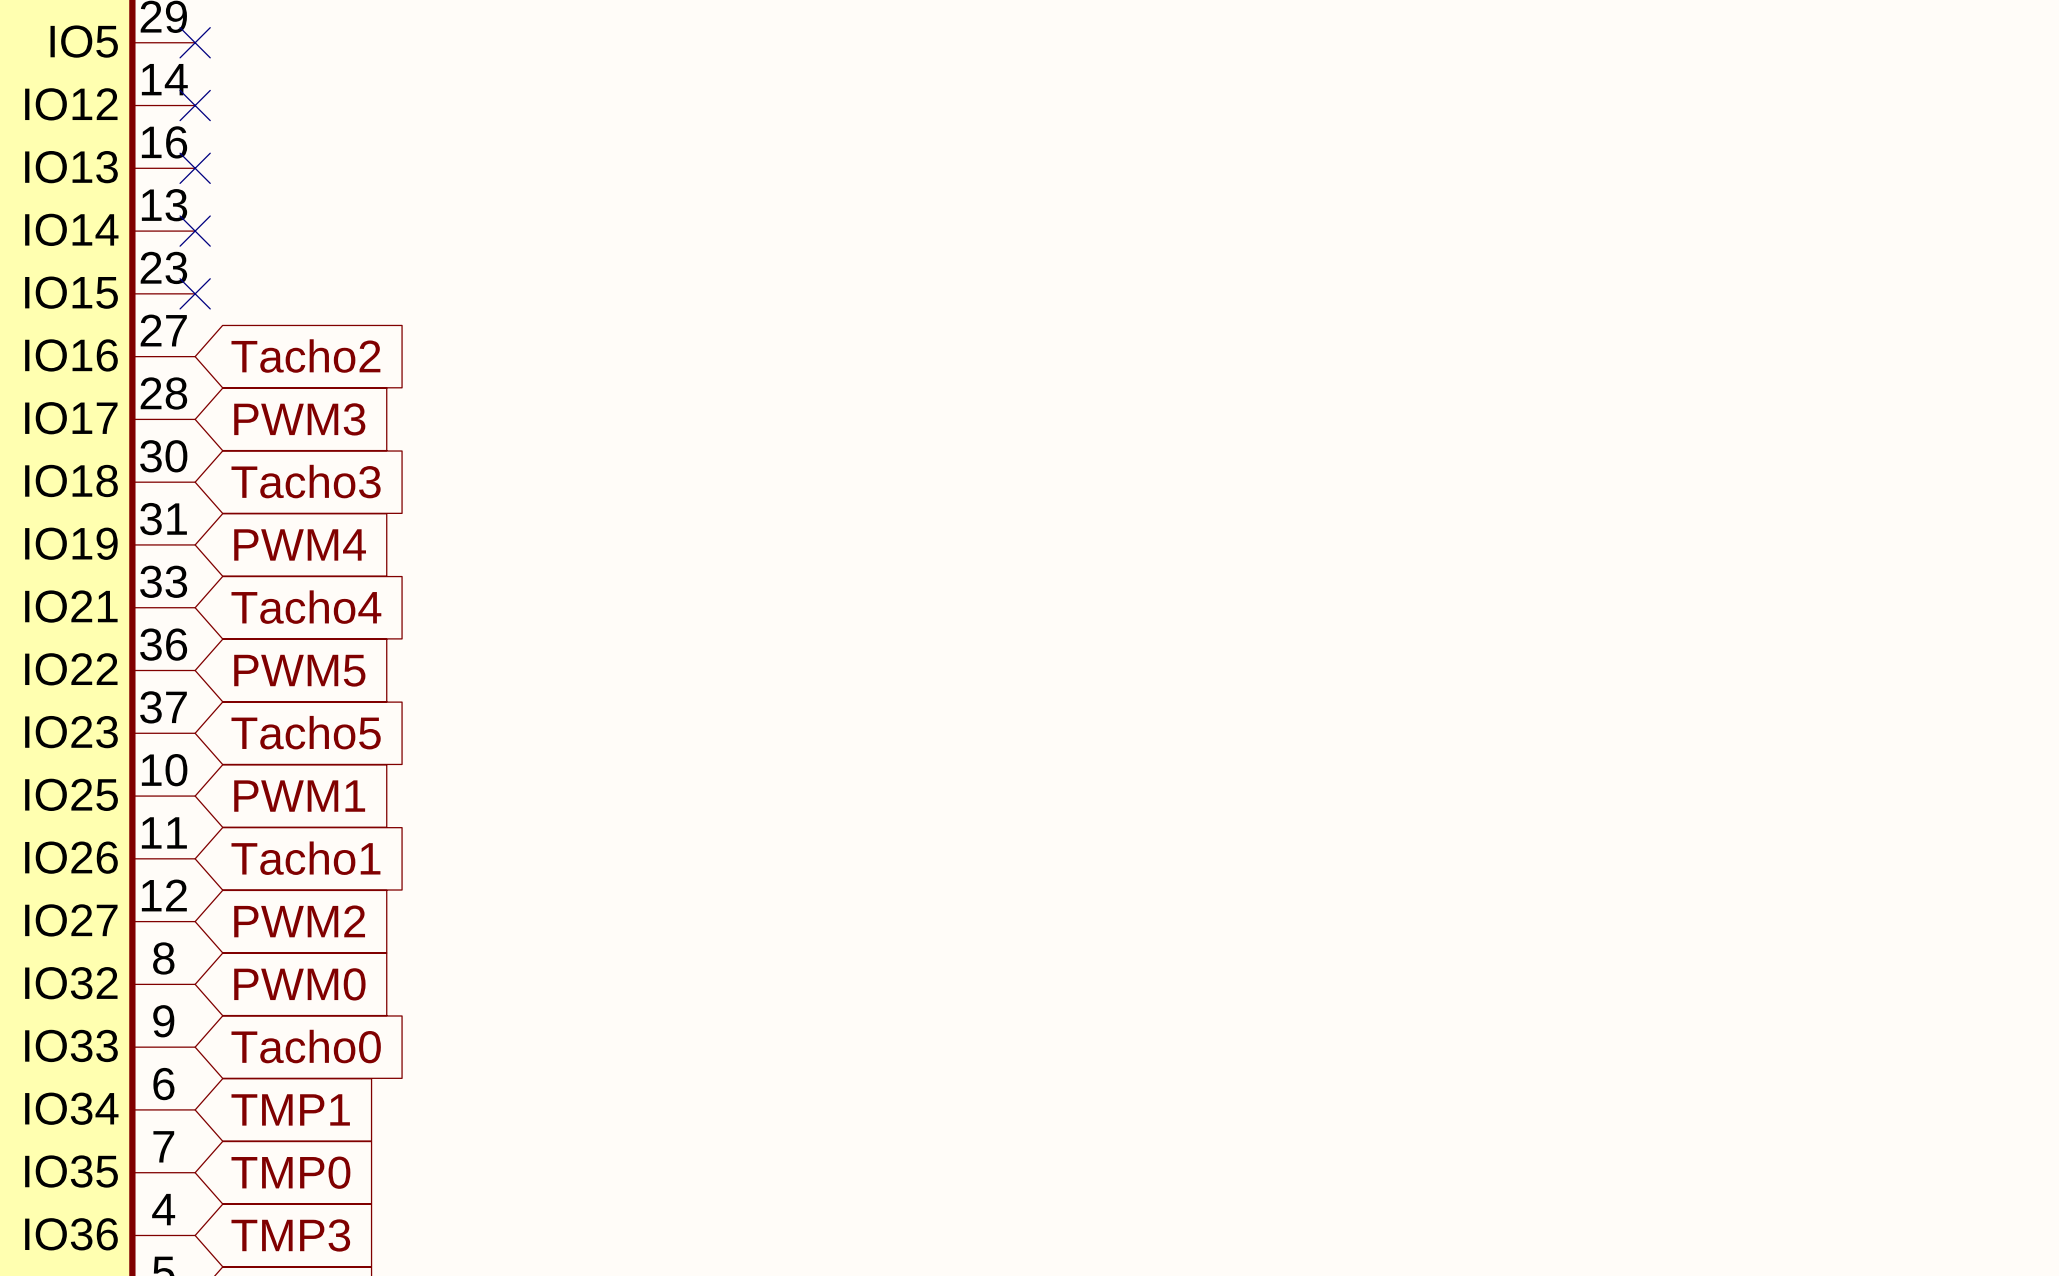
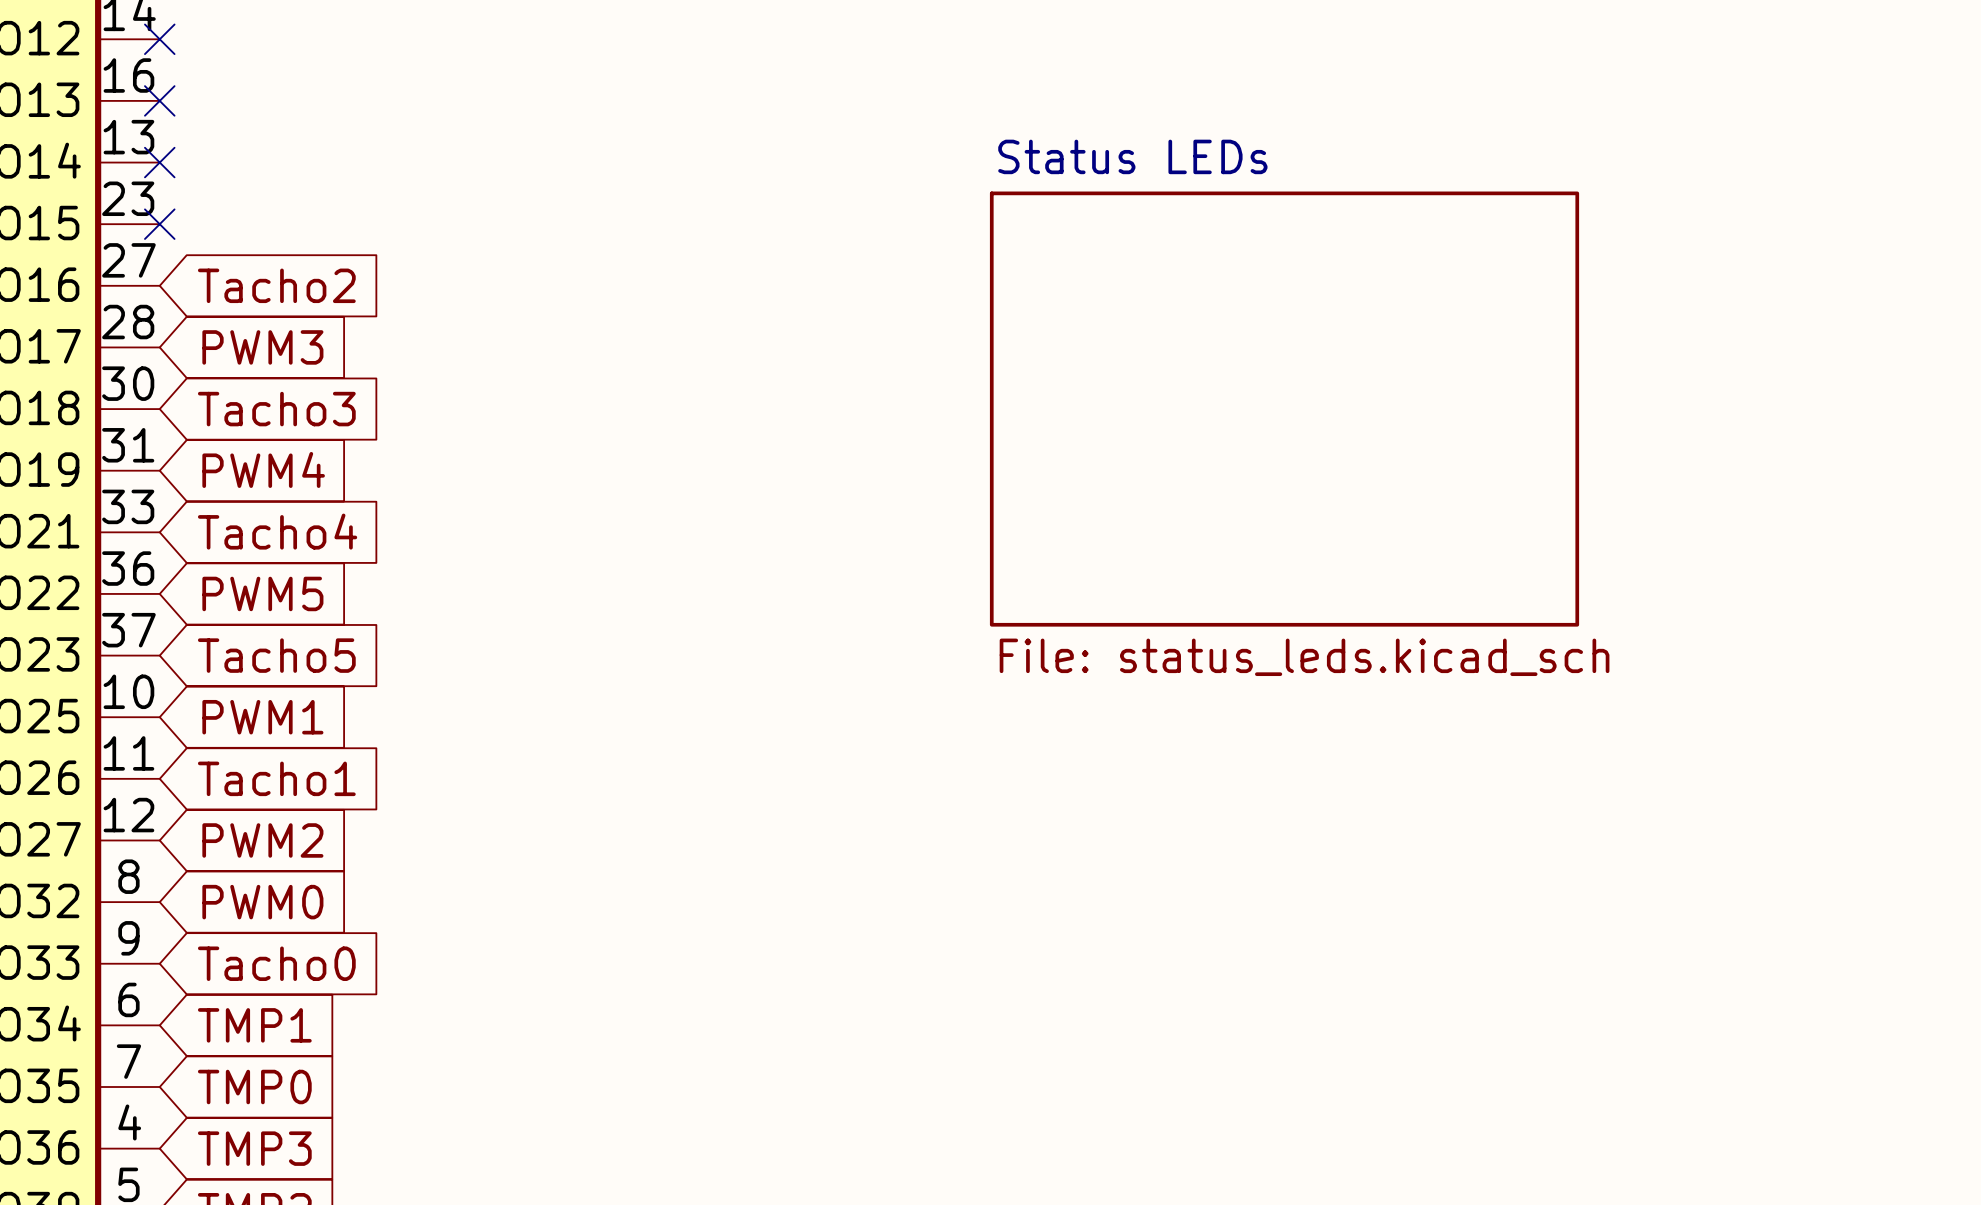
sheet Status LEDs: none -> File: status_leds.kicad_sch (1284, 409)

